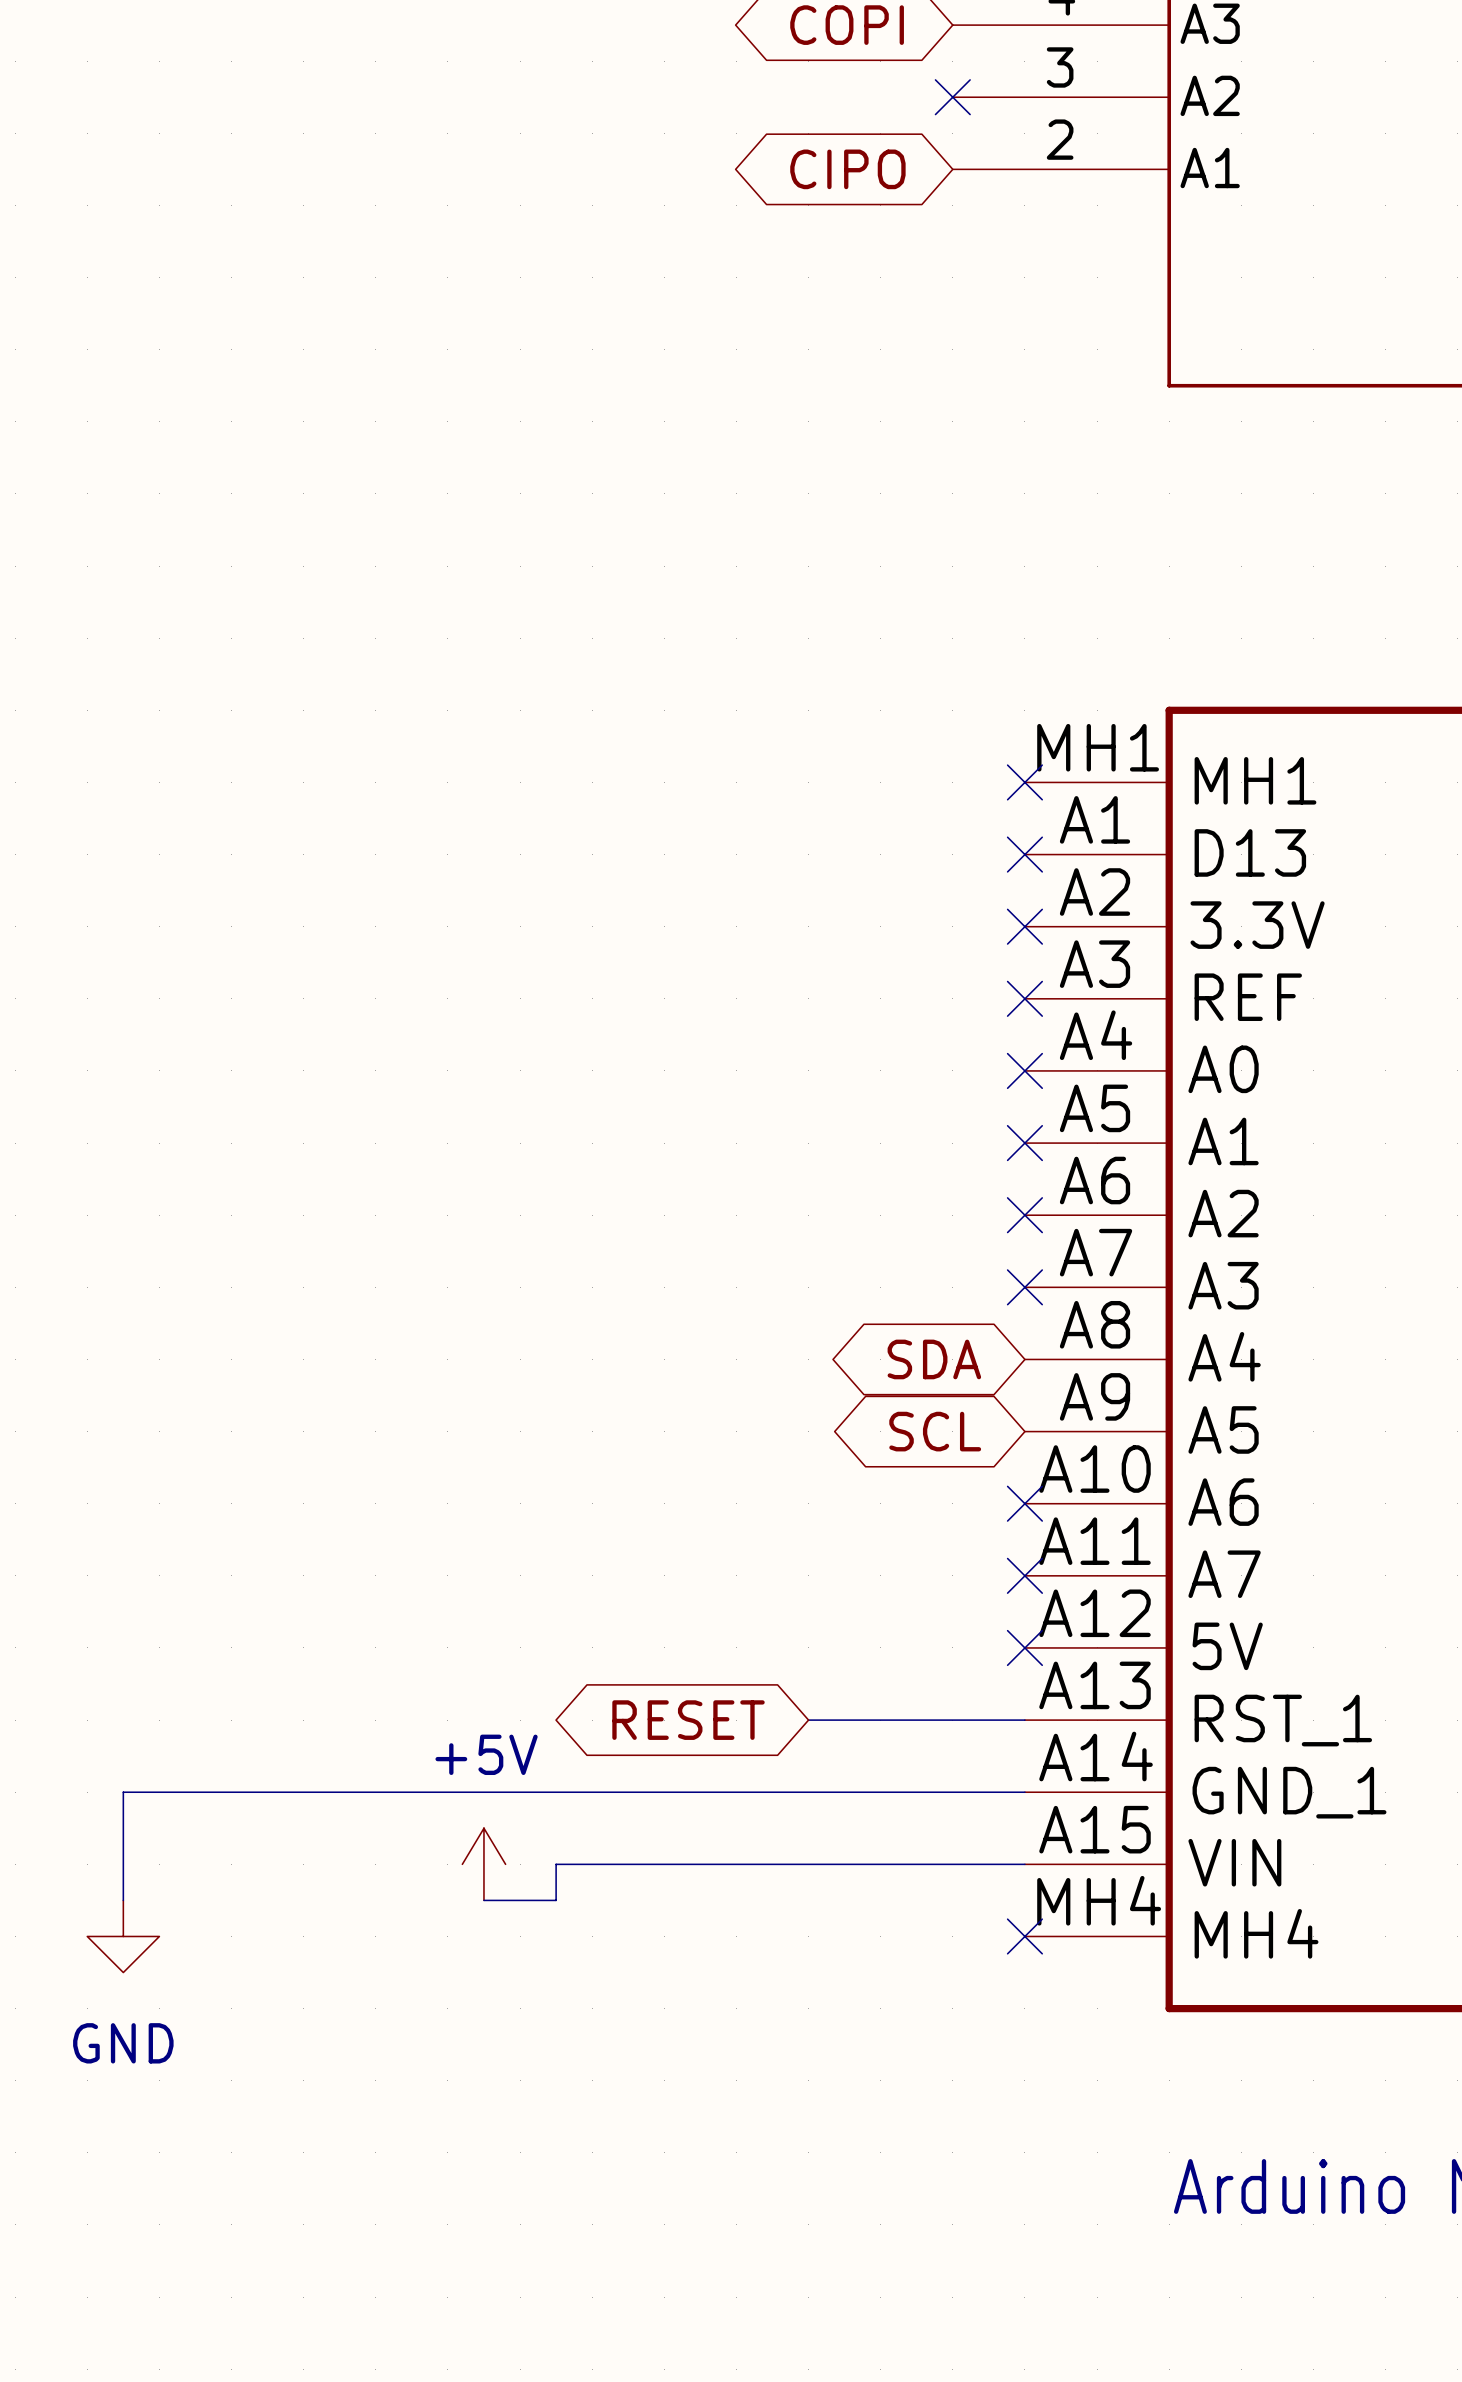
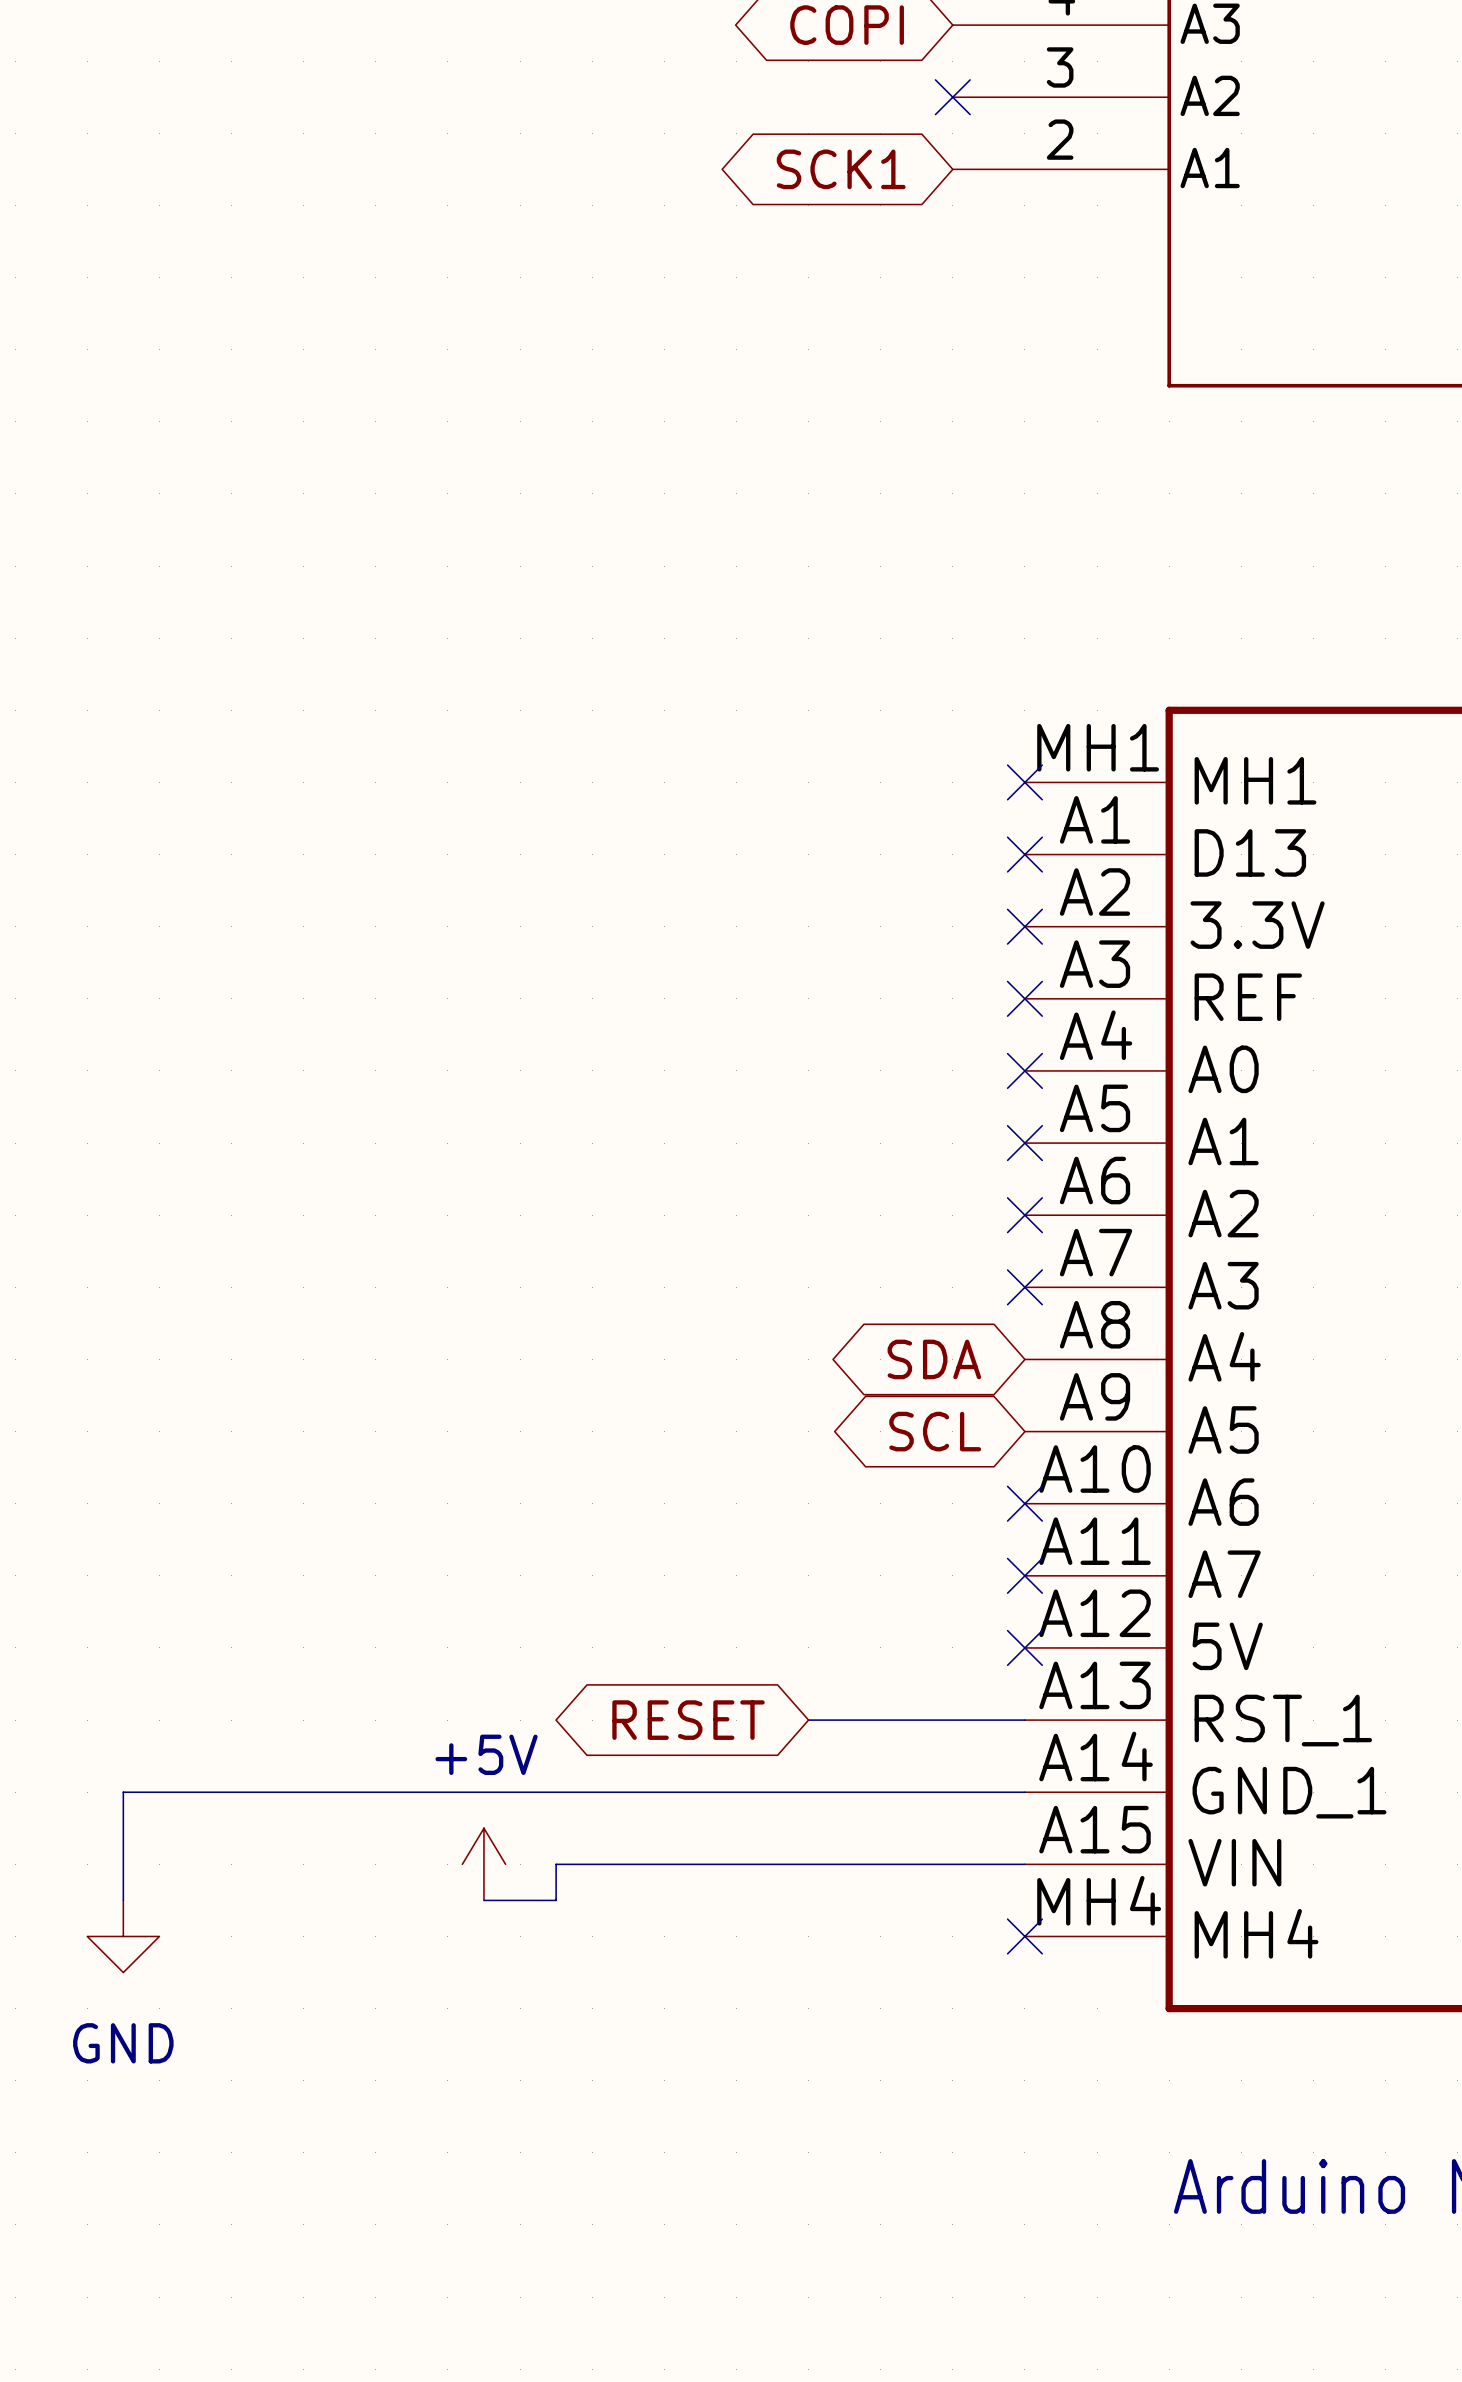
global label: CIPO (847, 169) -> SCK1 (841, 169)

